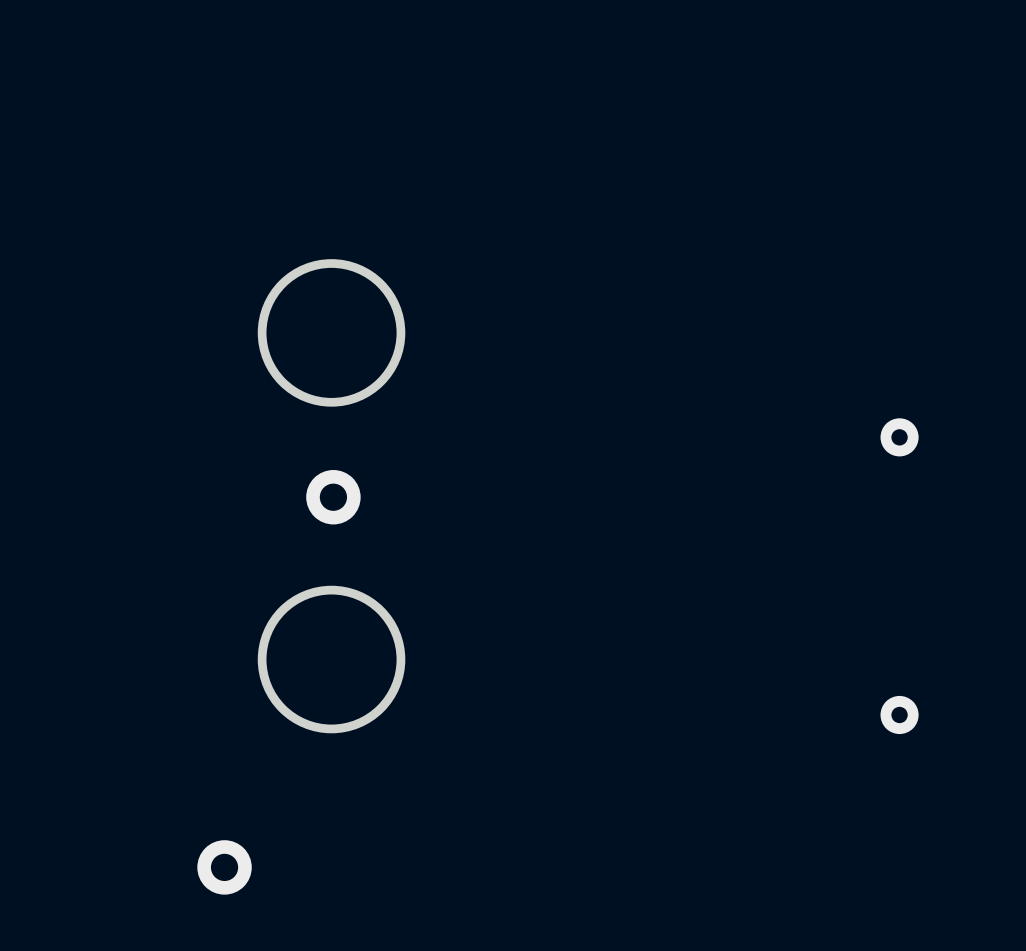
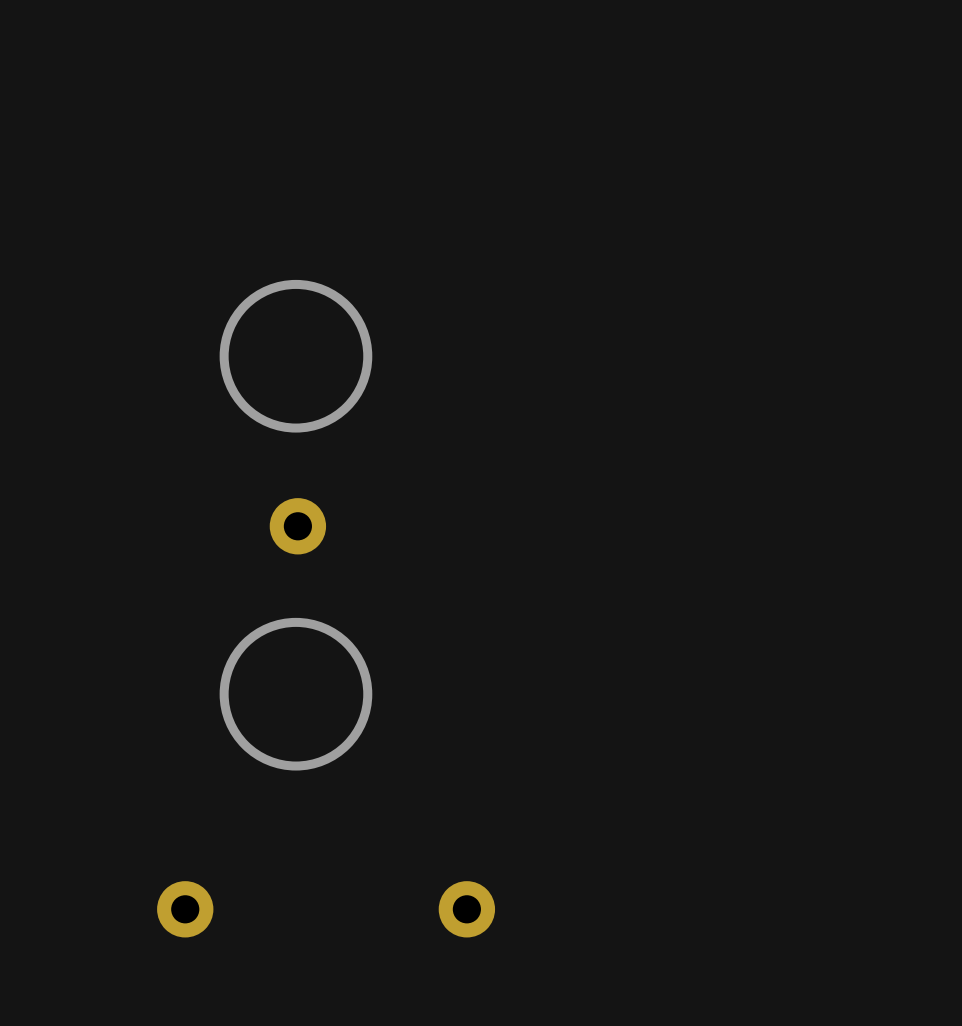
via: (899, 437) -> none
via: (899, 714) -> none
via: none -> (466, 909)

